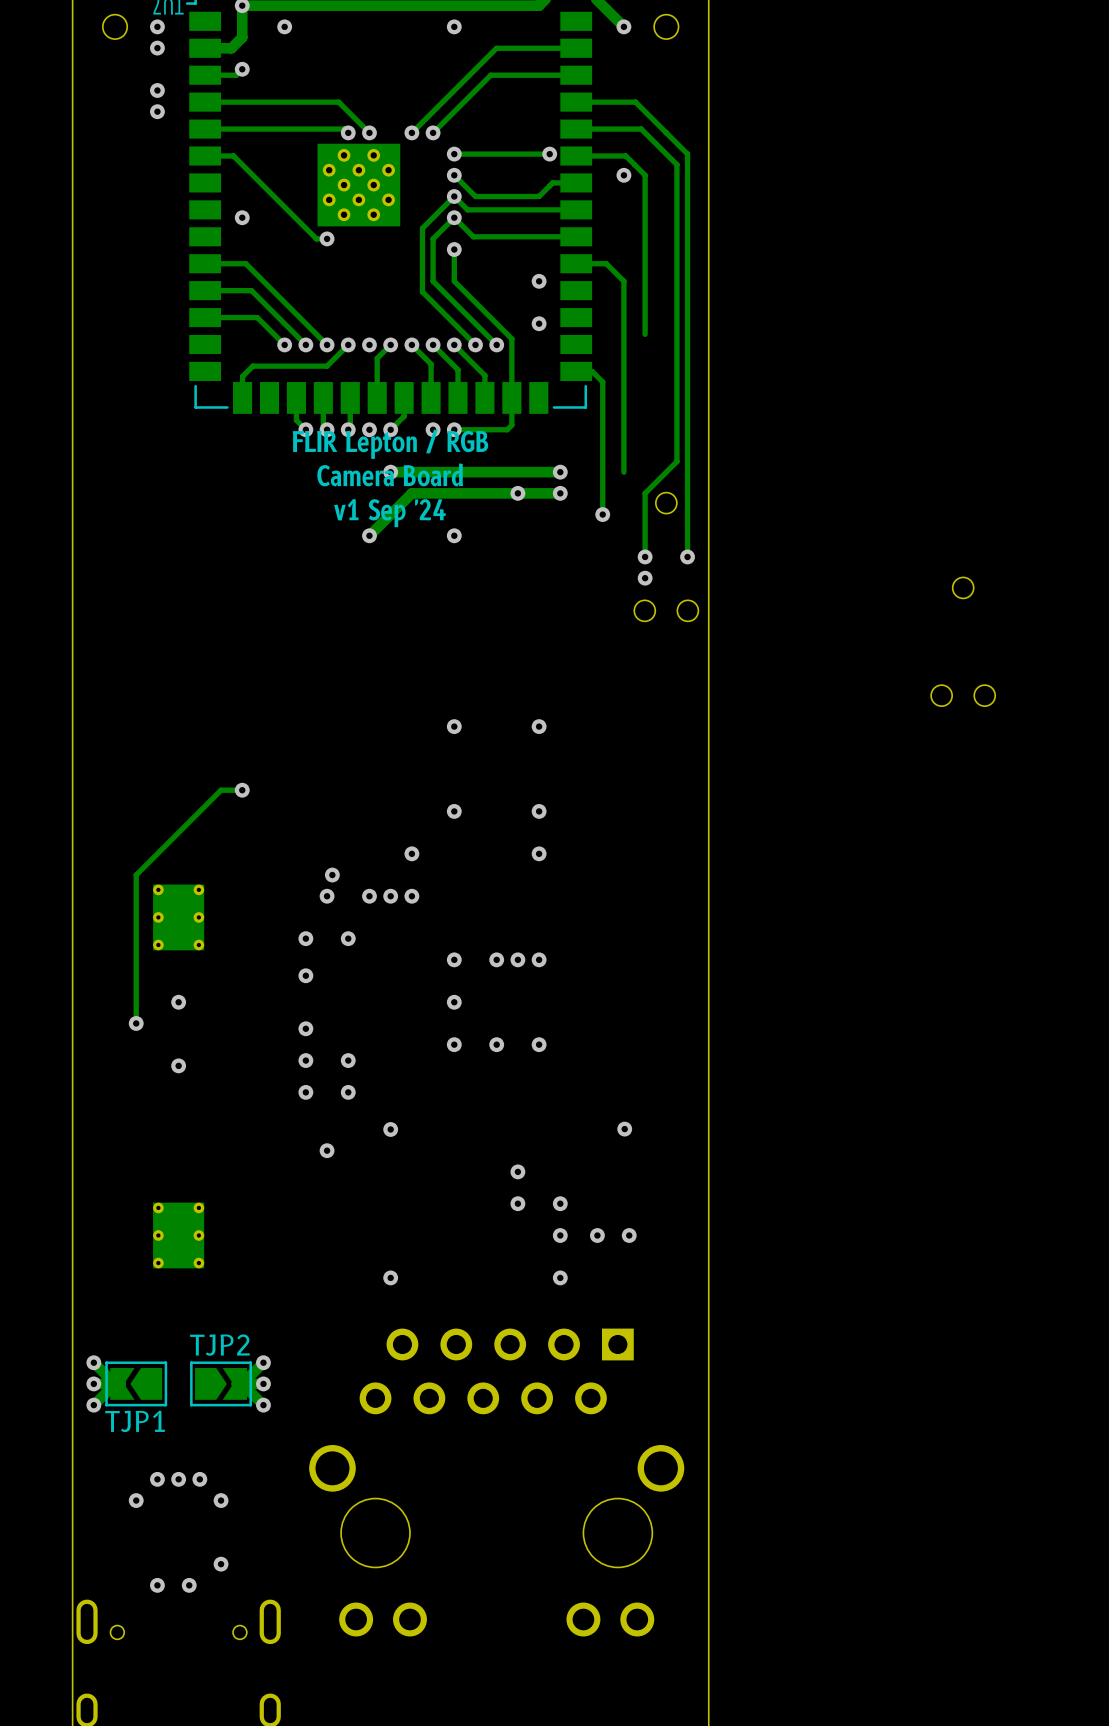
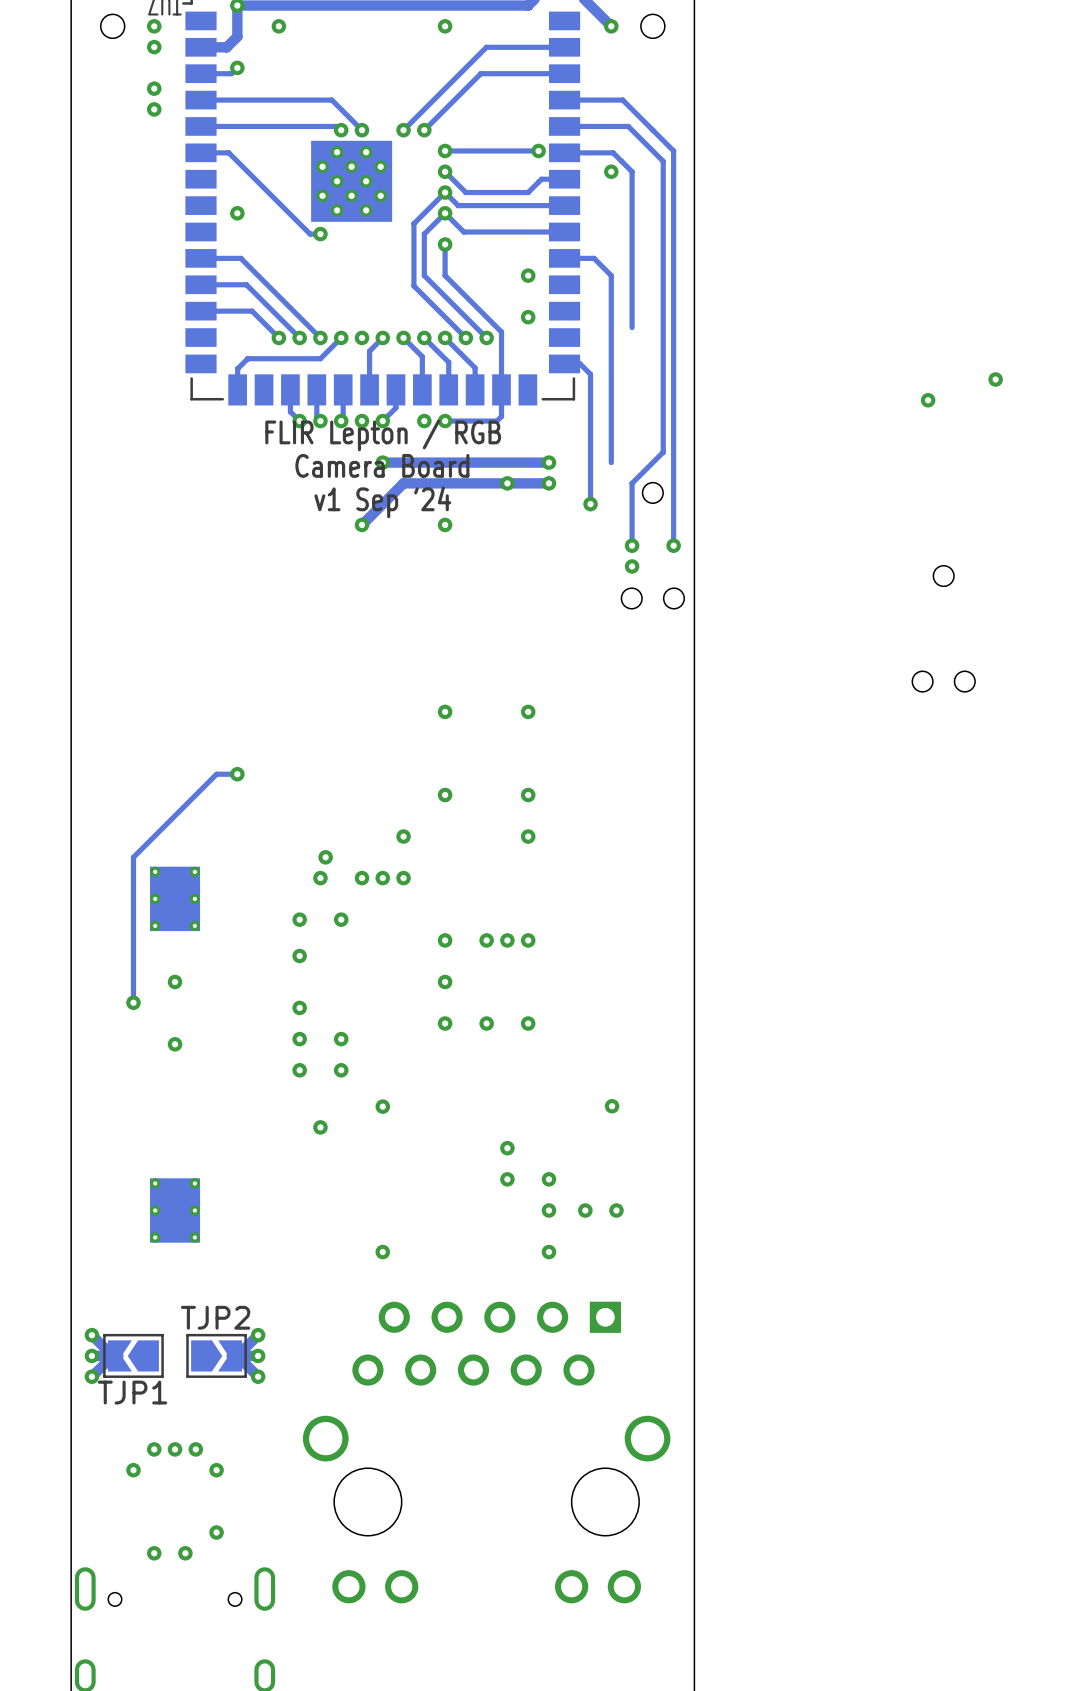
via: none -> (995, 379)
via: none -> (928, 400)

